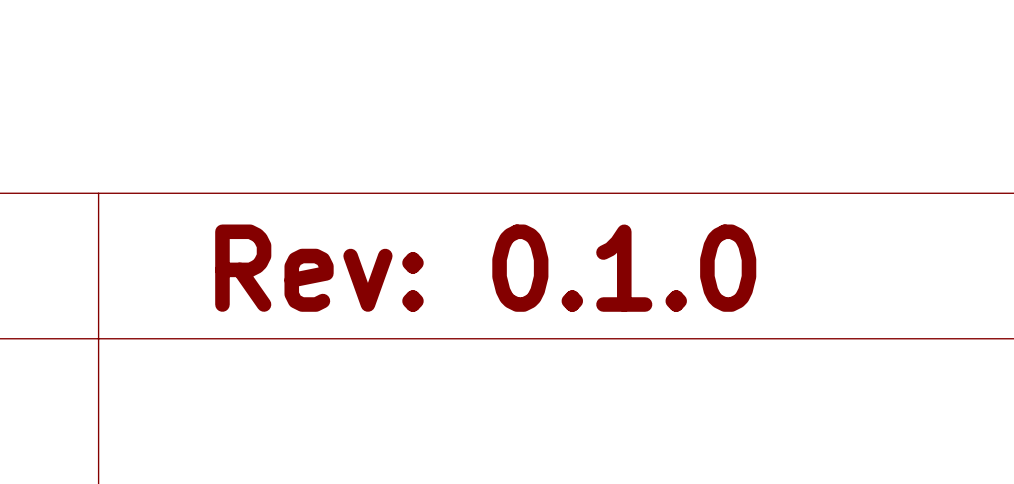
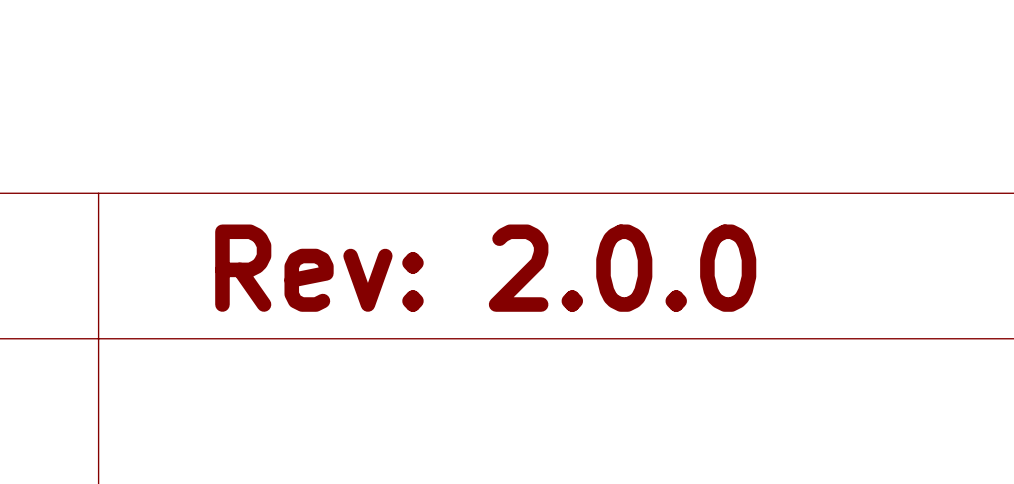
title block: Rev: 0.1.0 (485, 268) -> Rev: 2.0.0 (485, 268)

